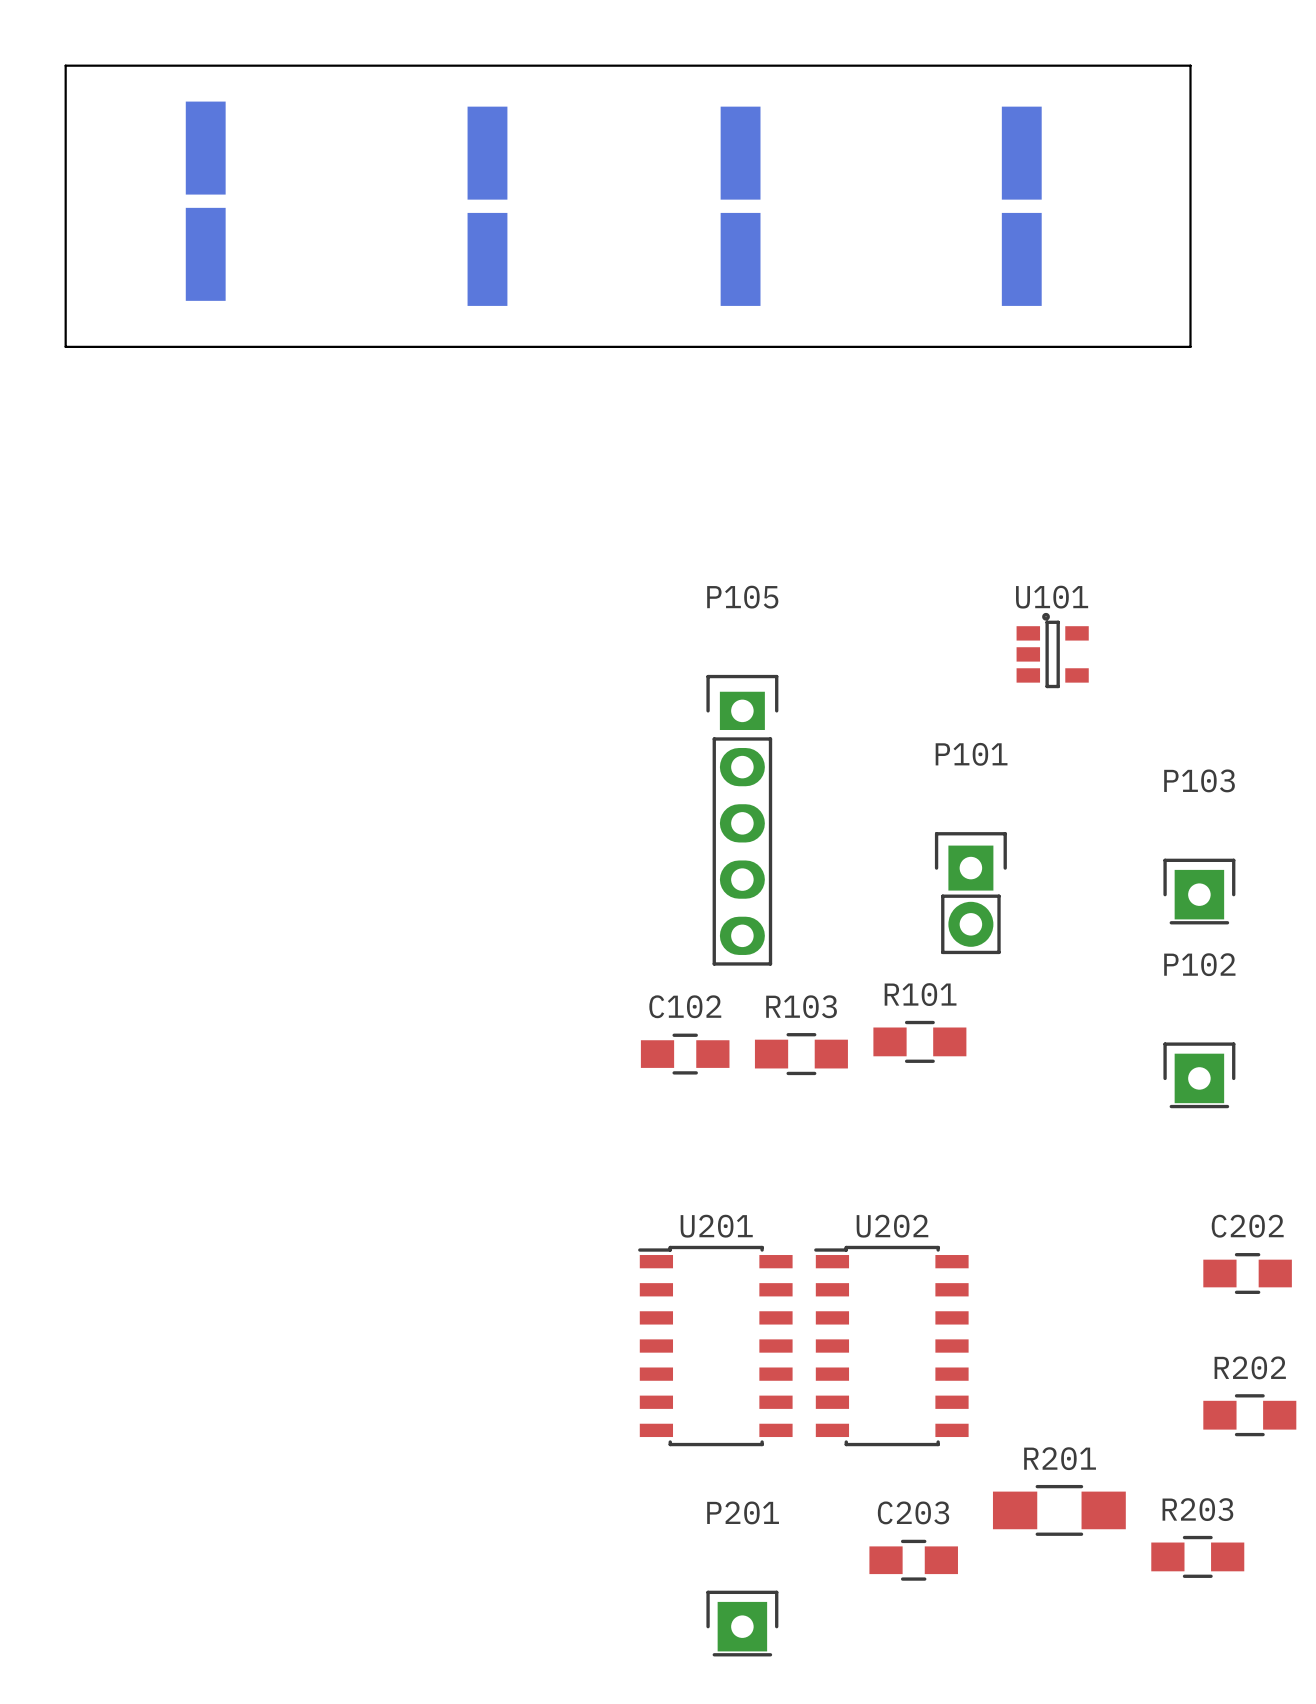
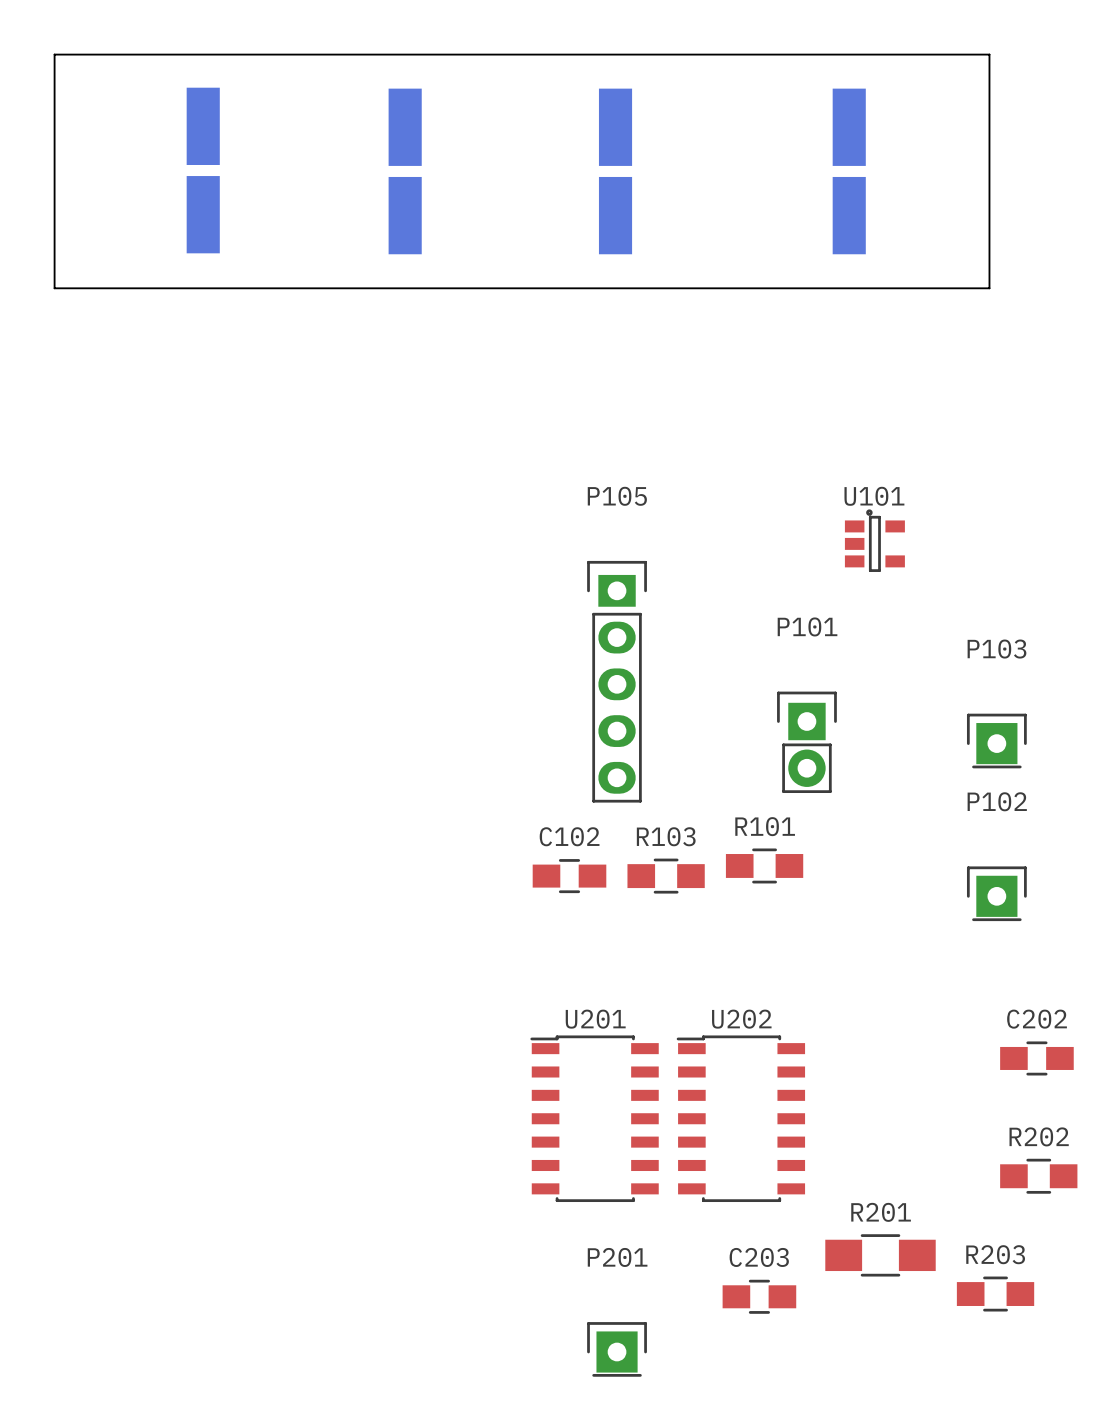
part position: (205, 201) -> (203, 170)

